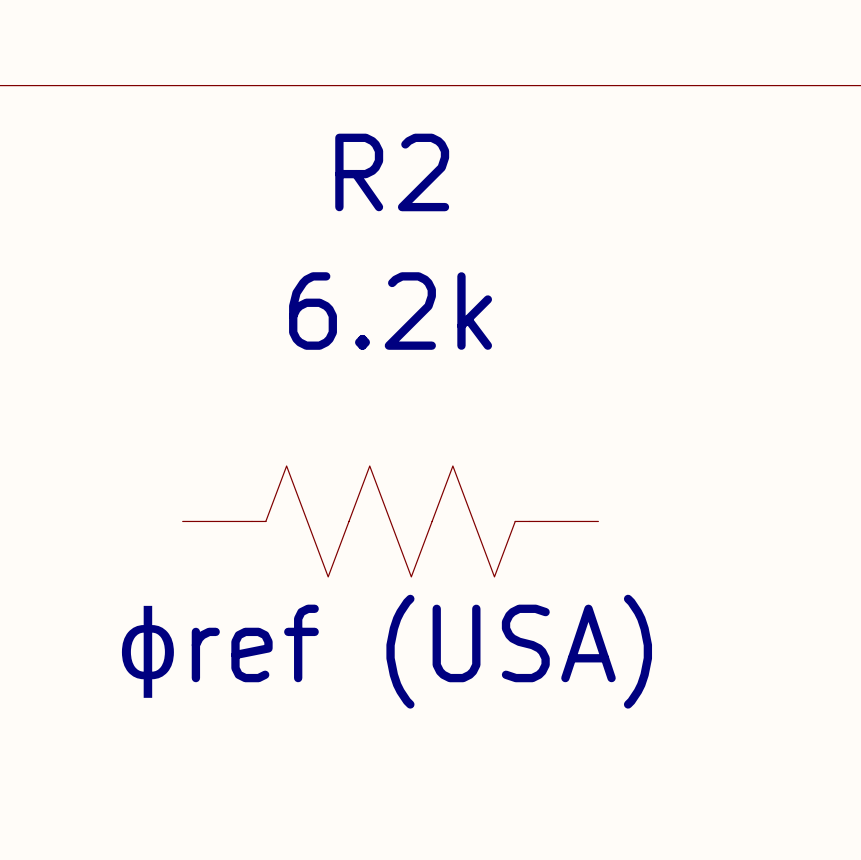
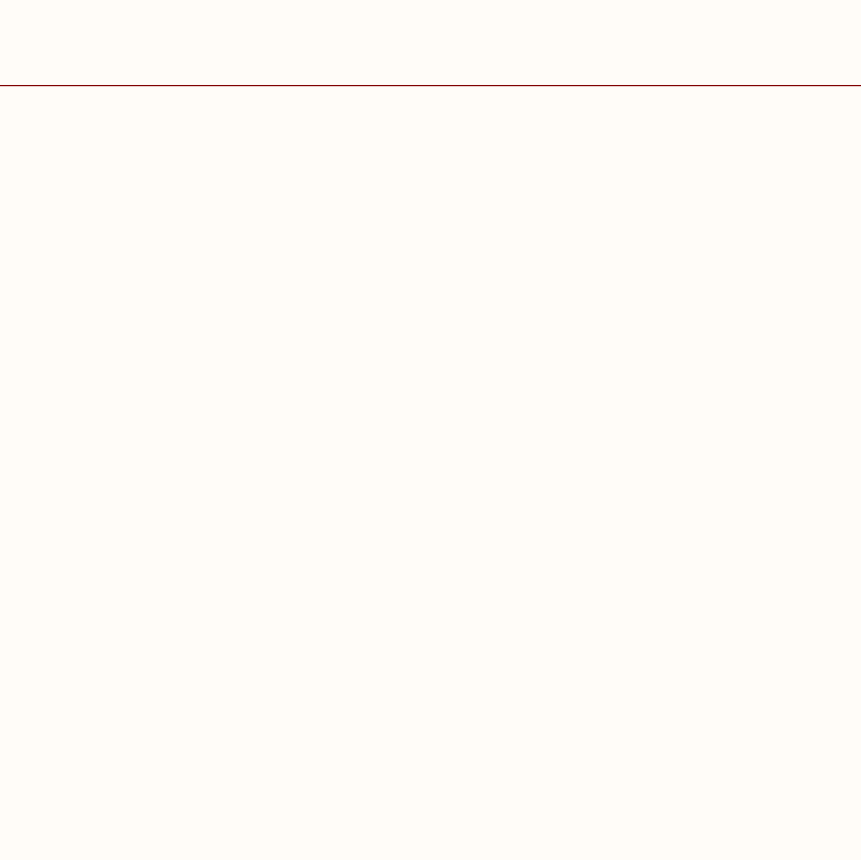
R2: 6.2k (390, 521) -> none
text: ϕref (USA) (384, 651) -> none

